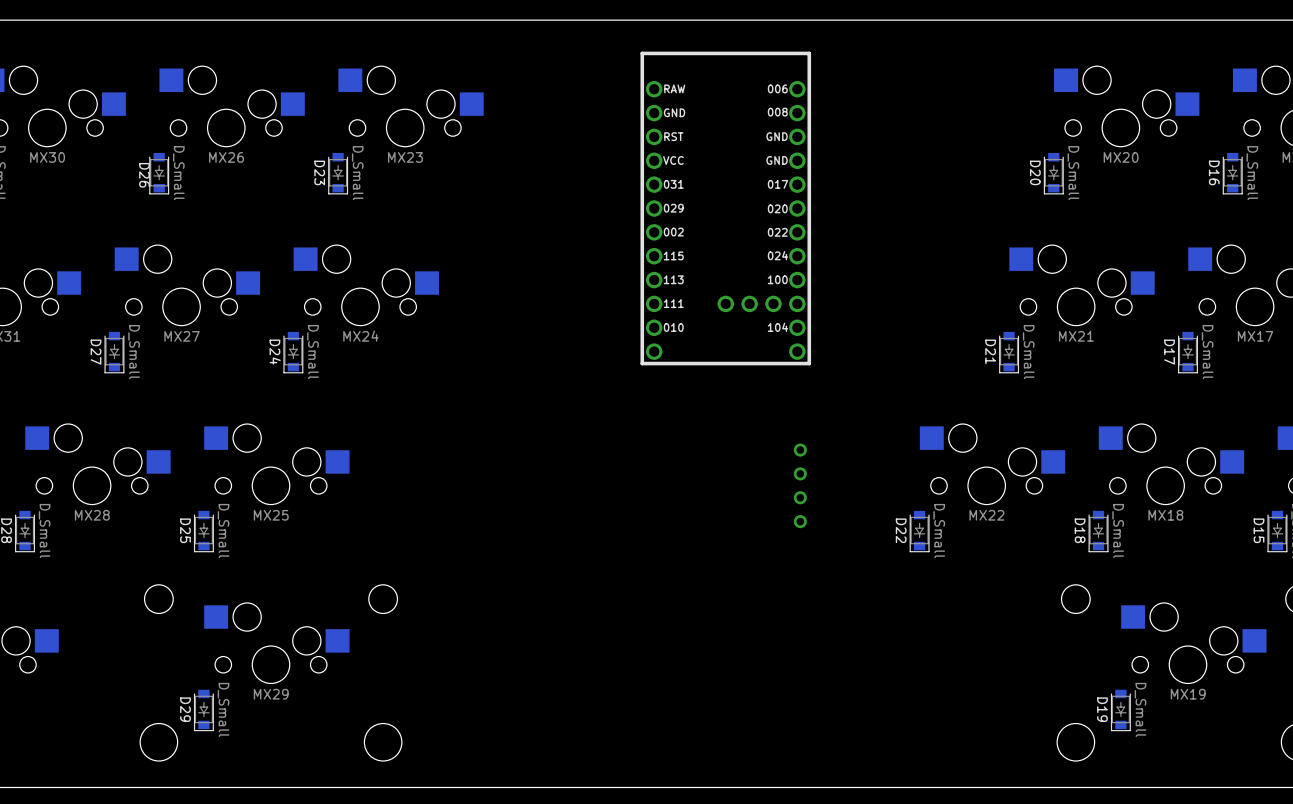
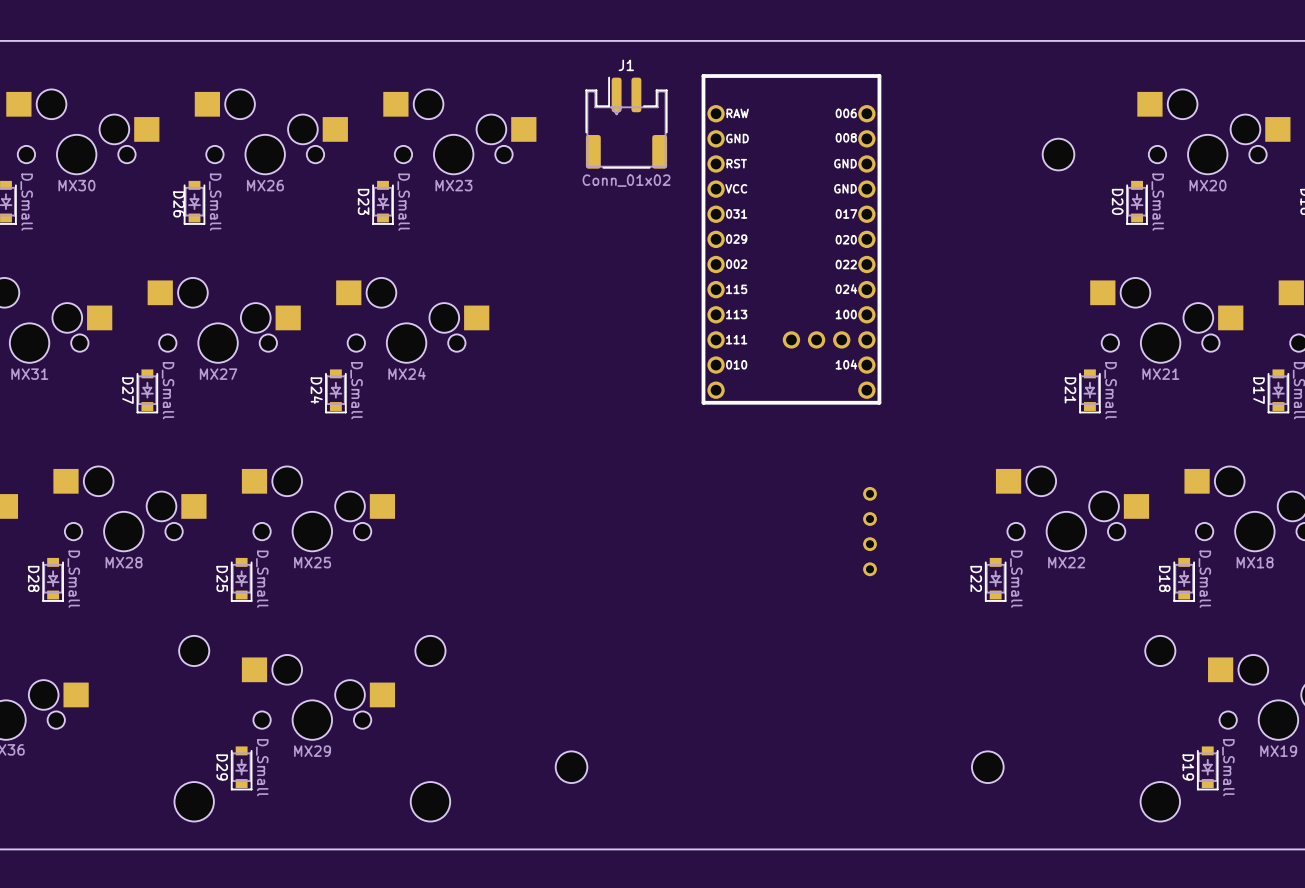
J1: none -> Conn_01x02 (626, 122)
part: none -> (1058, 154)
part: none -> (571, 767)
part: none -> (987, 767)

